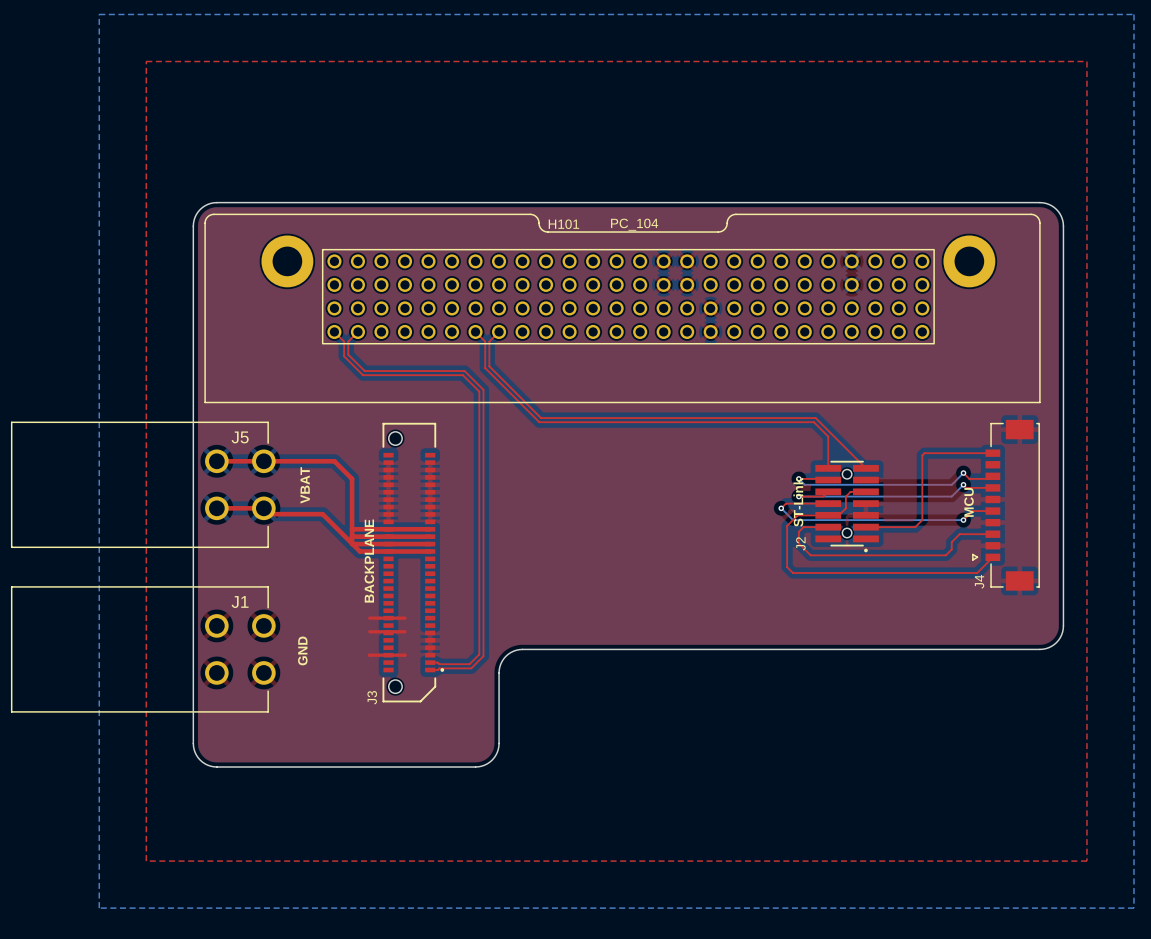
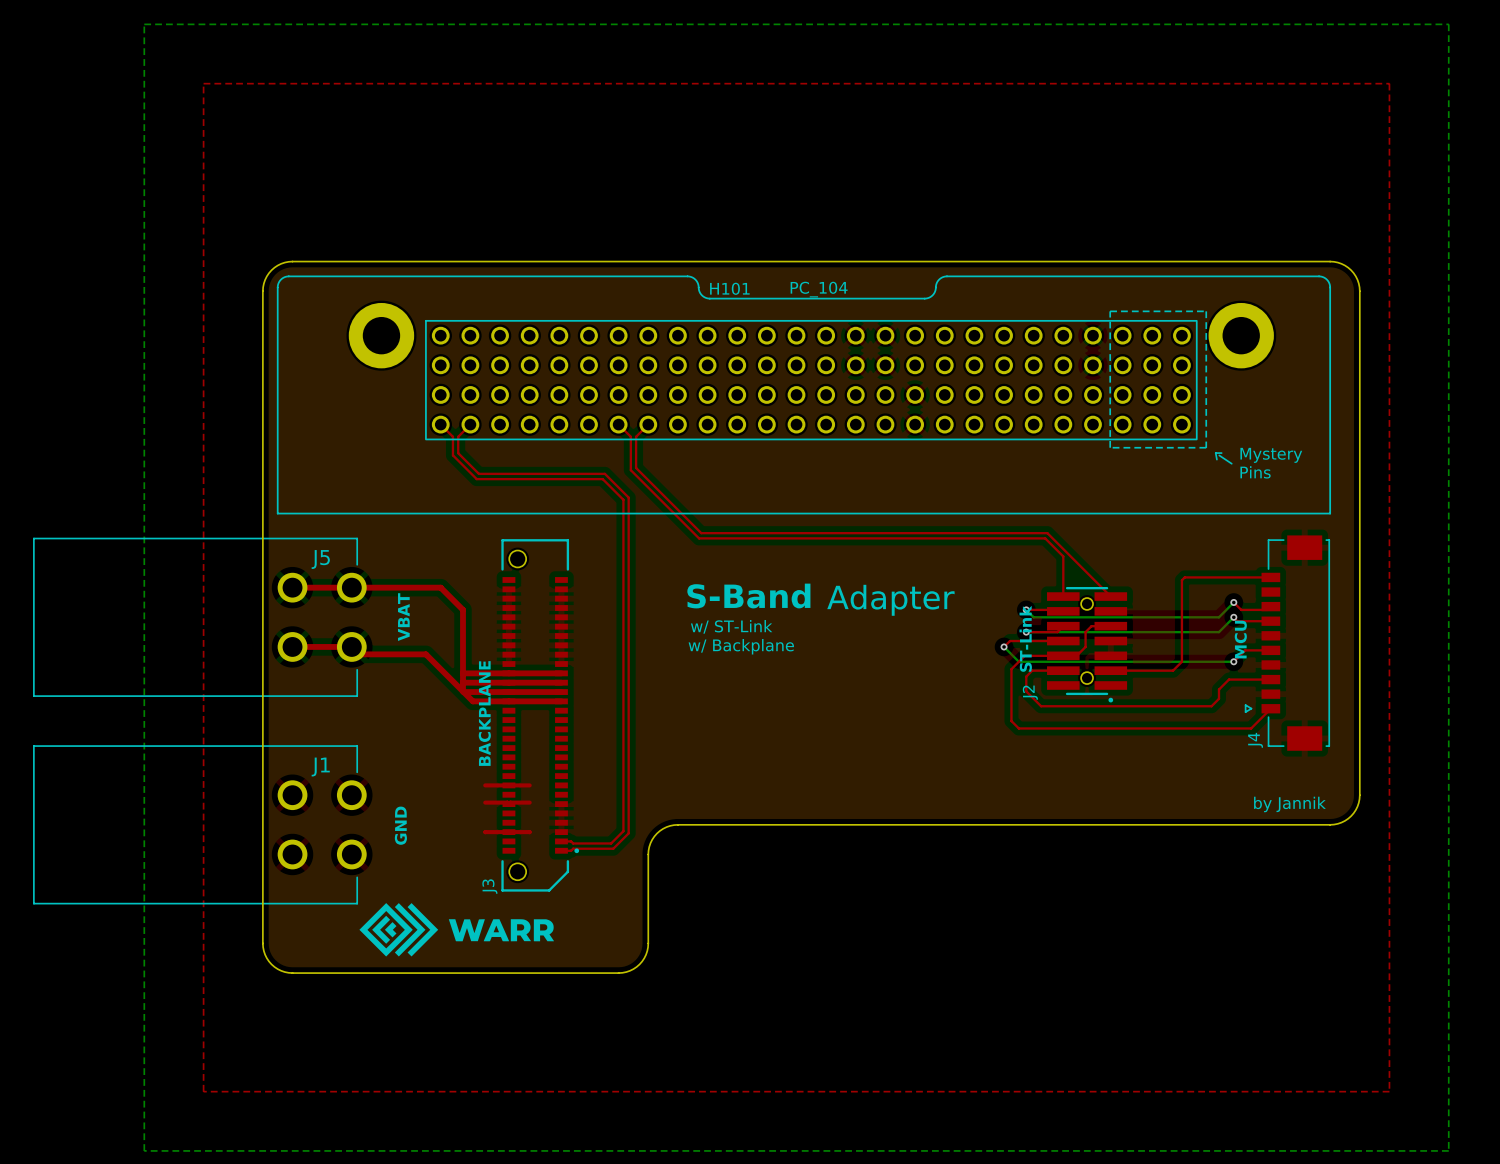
line: none -> (1110, 311) (1206, 311) (1206, 447) (1110, 447) (1110, 311)
line: none -> (1221, 453) (1215, 453) (1216, 459)
line: none -> (1219, 455) (1231, 463)
text: none -> Mystery (1271, 455)
text: none -> Pins (1255, 472)
text: none -> S-Band (748, 596)
text: none -> Adapter (890, 600)
text: none -> w/ ST-Link (731, 626)
text: none -> w/ Backplane (741, 646)
text: none -> by Jannik (1289, 804)
drawing: none -> [359, 903, 555, 957]

